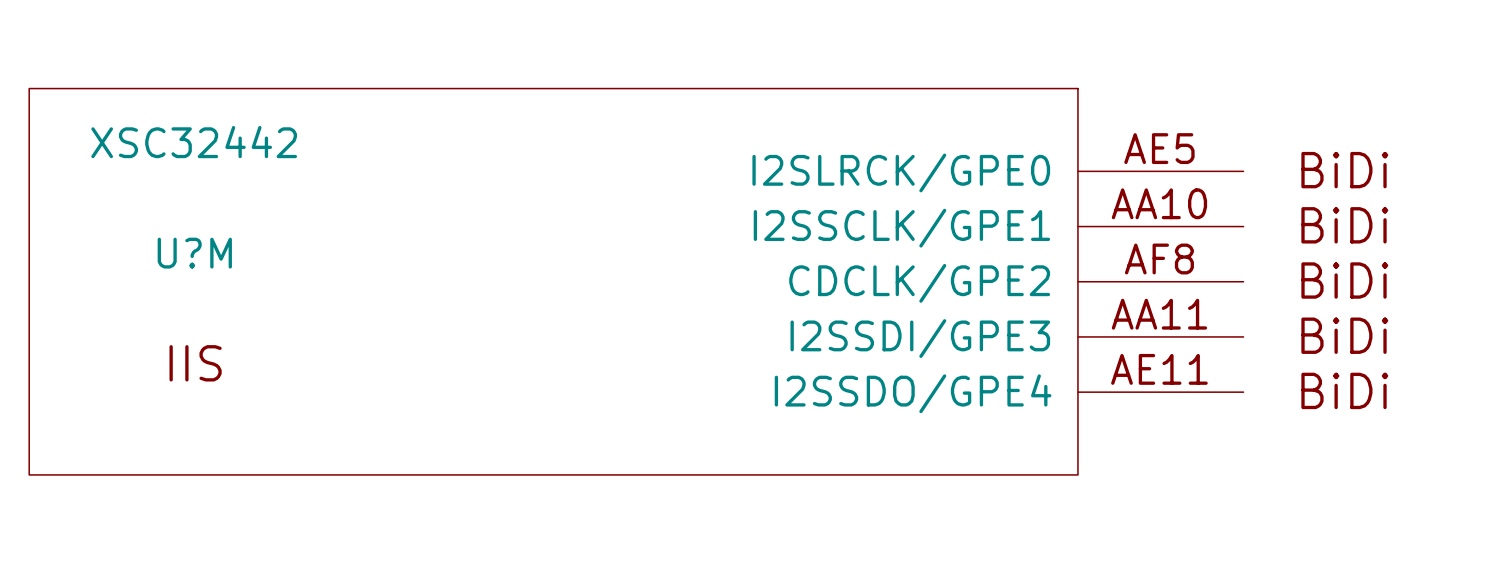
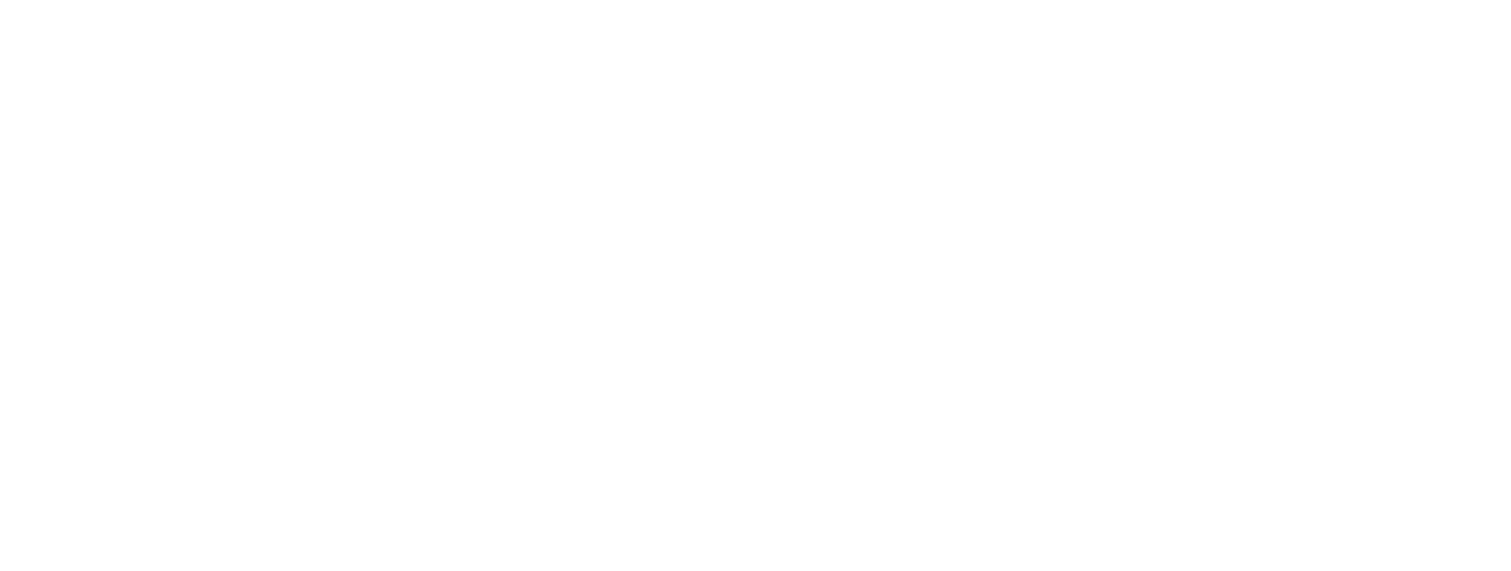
U?M: XSC32442 (636, 281) -> none

